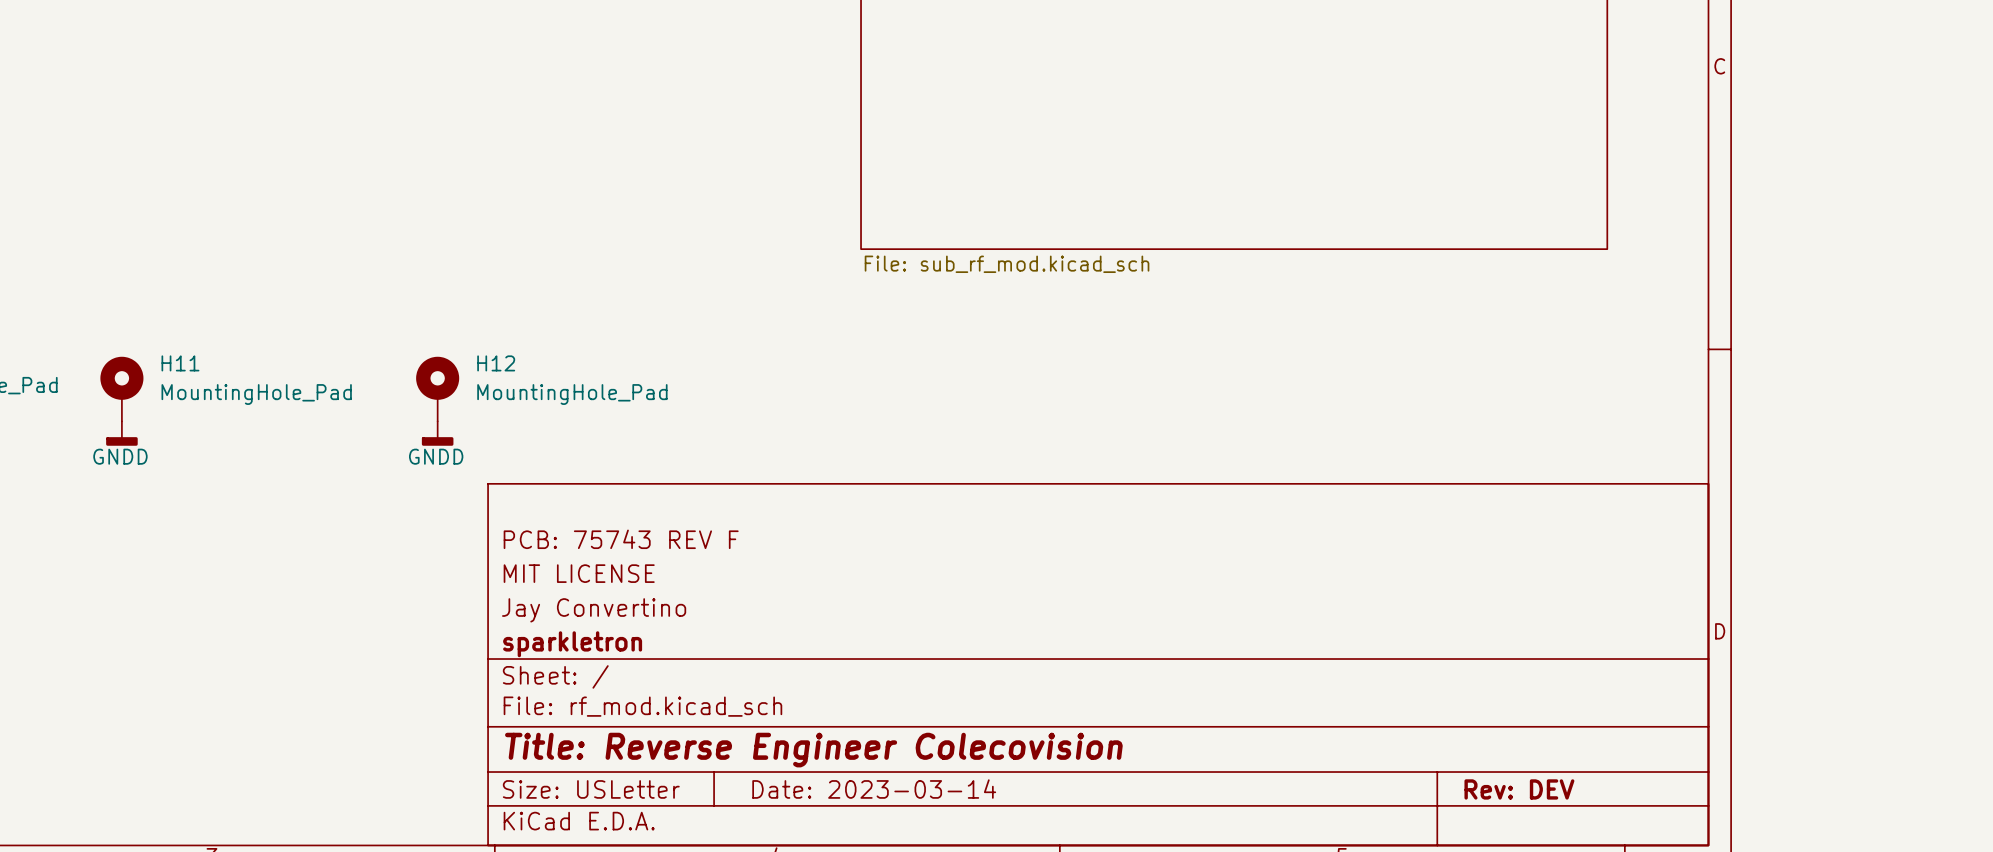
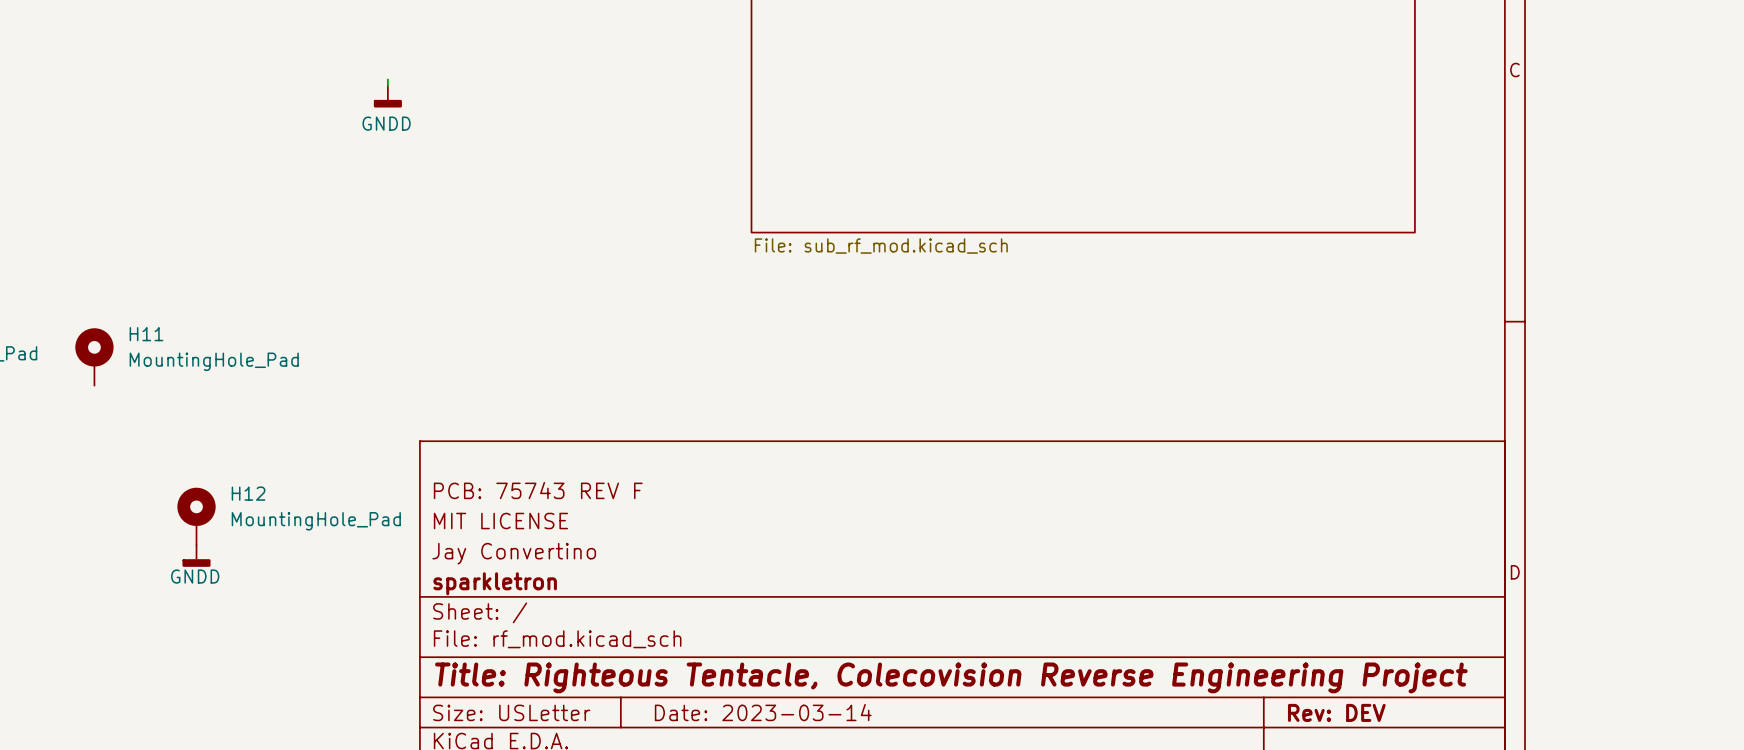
wire: none -> (387, 79) (387, 85)
power symbol: none -> GNDD (387, 96)
H12 position: (437, 389) -> (196, 516)
power symbol: GNDD (121, 433) -> none
power symbol: GNDD (437, 433) -> none
power symbol: none -> GNDD (196, 555)
title block: Title: Reverse Engineer Colecovision (813, 750) -> Title: Righteous Tentacle, Colecovision Reverse Engineering Project (951, 677)

